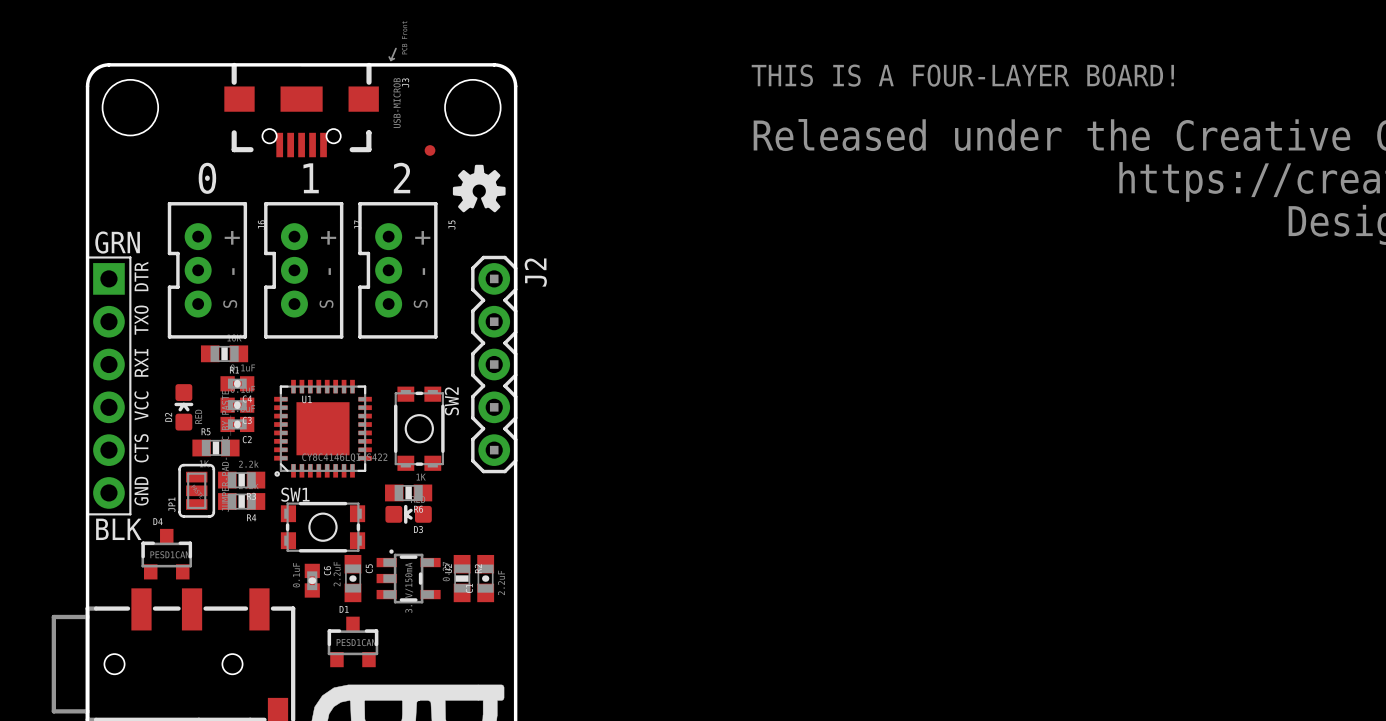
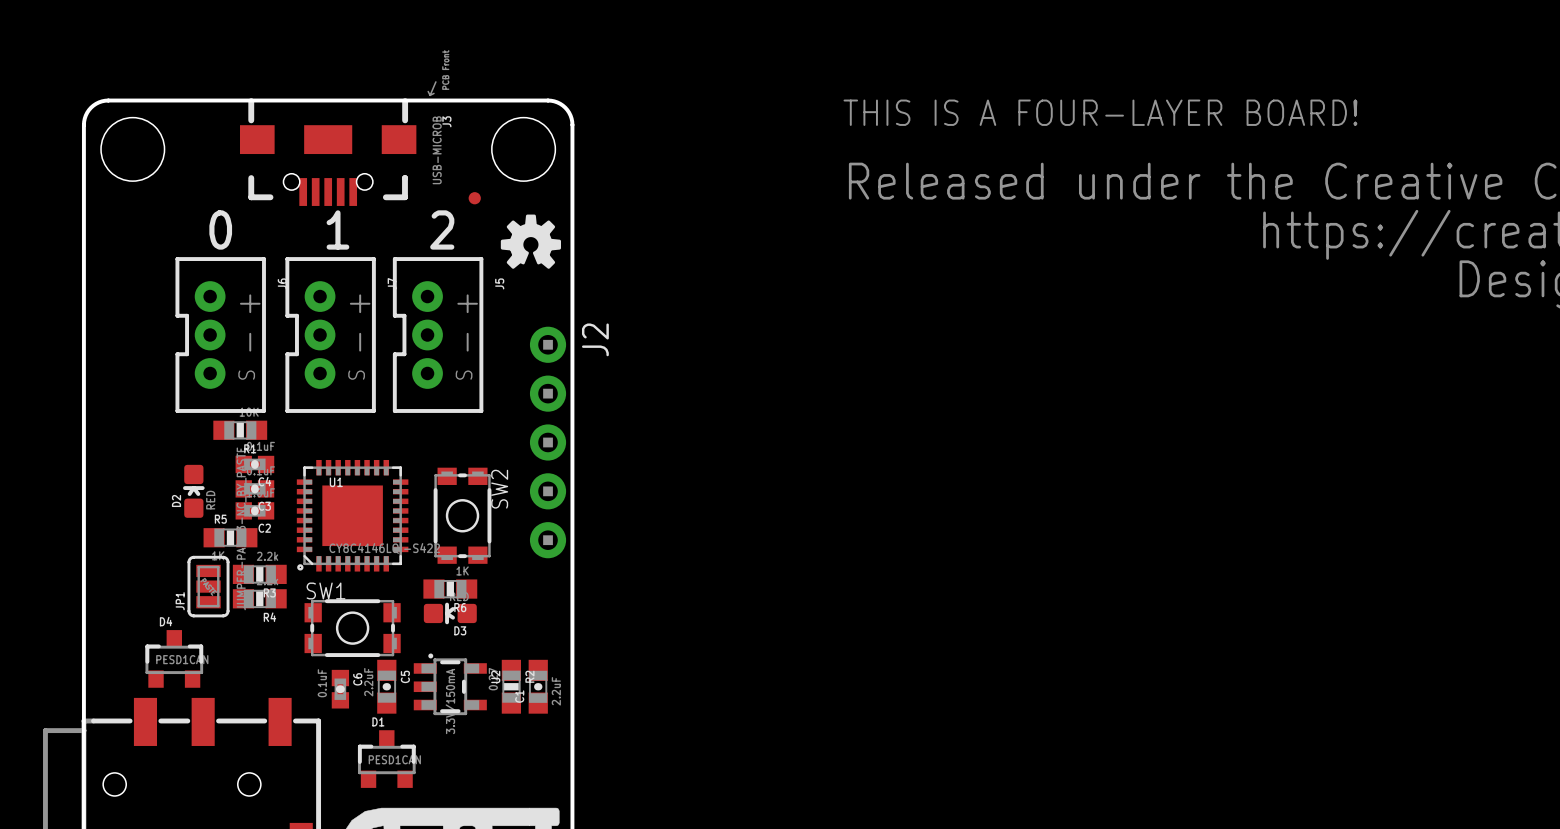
J2 footprint: [471, 255, 518, 474] -> [529, 326, 567, 559]
part: (108, 385) -> none

